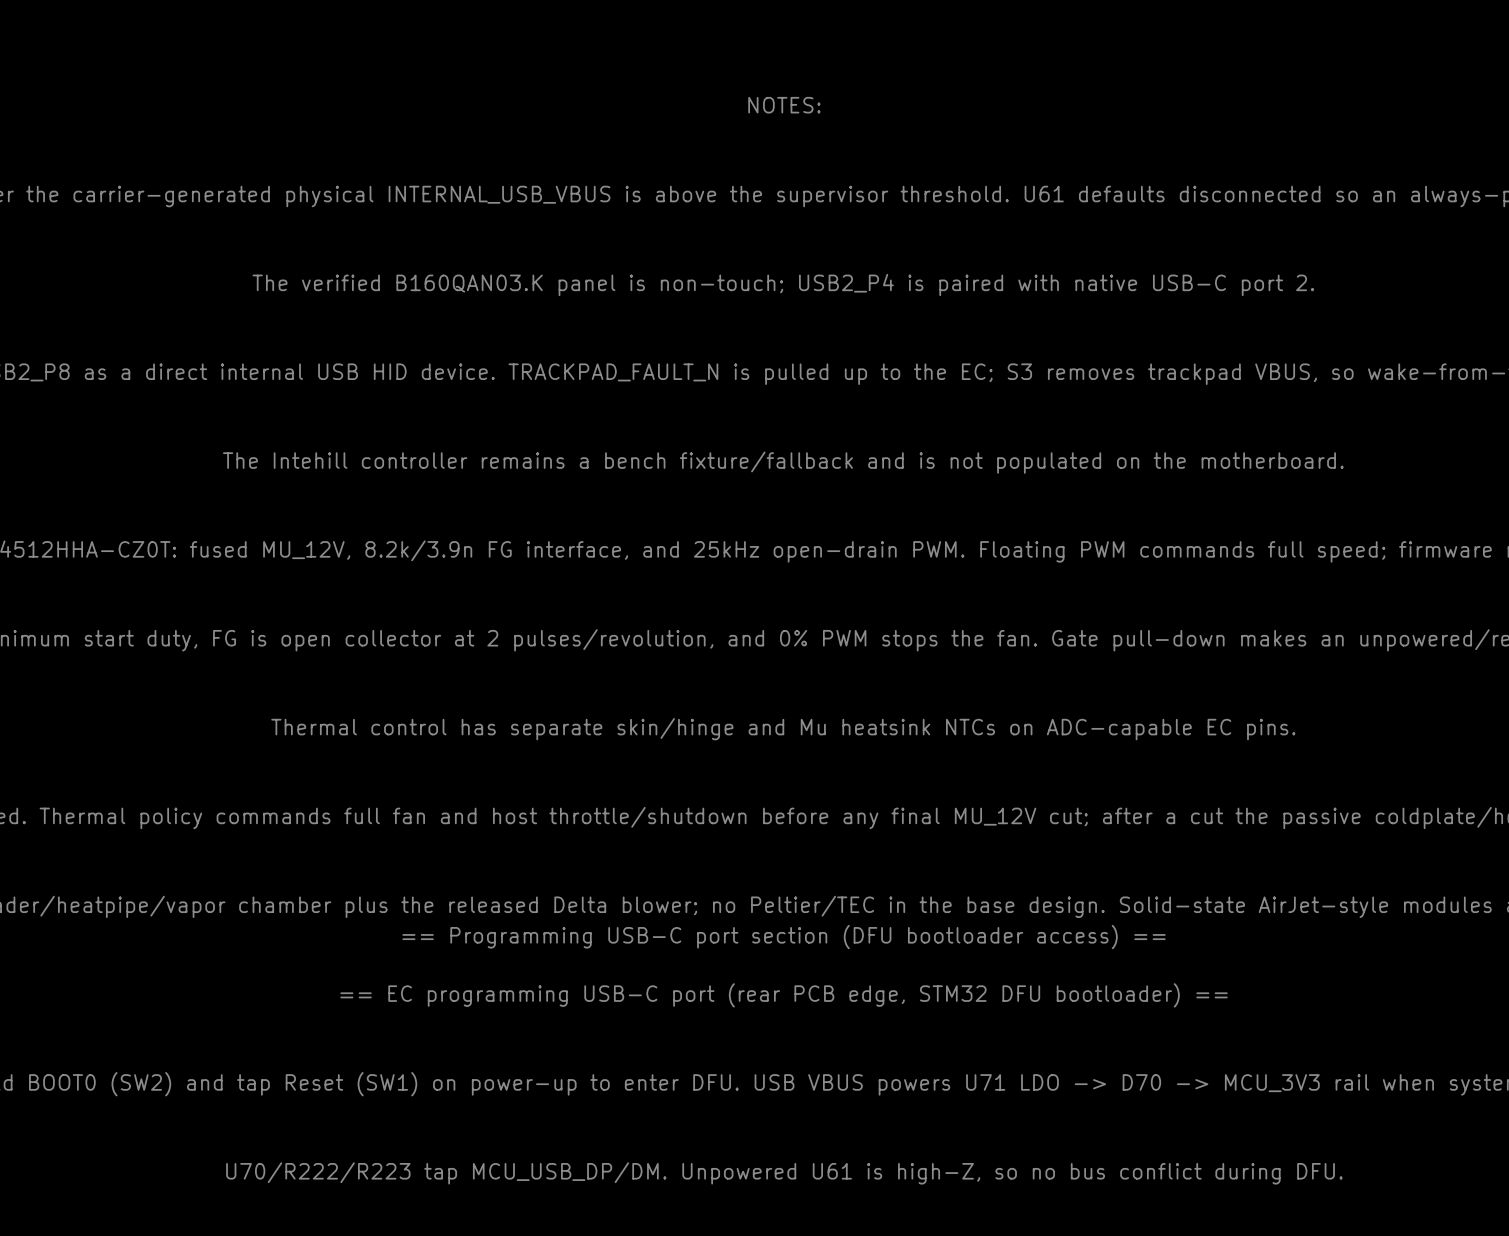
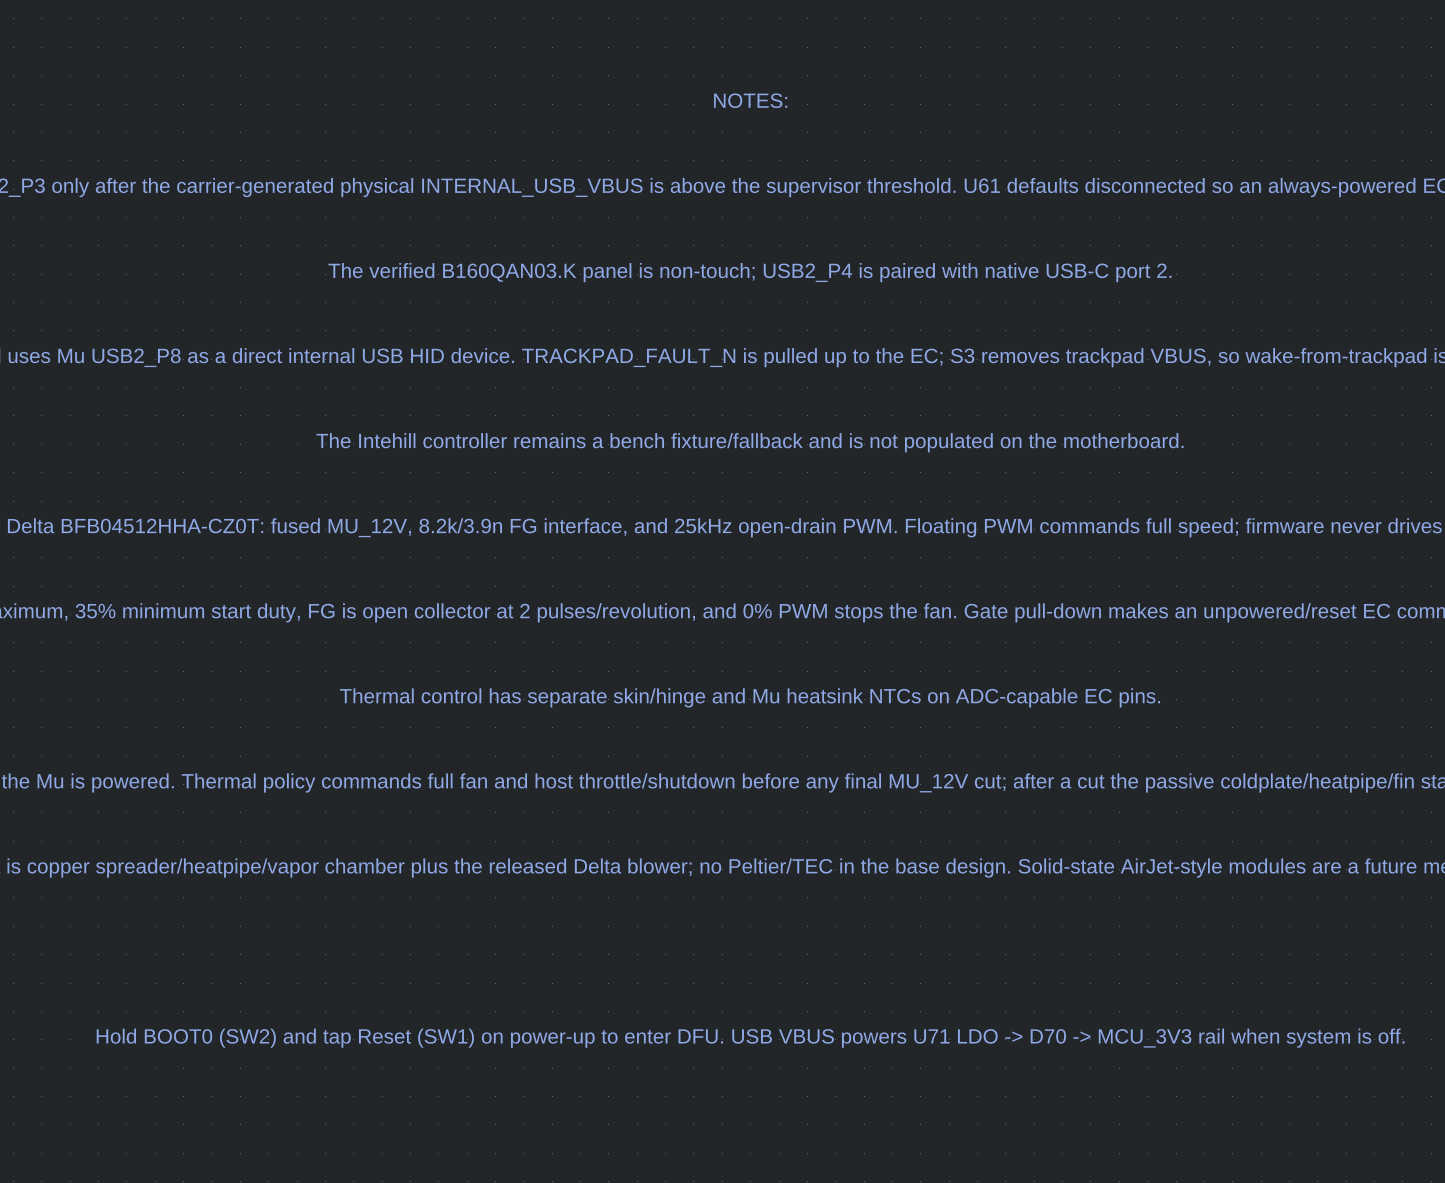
text: == Programming USB-C port section (DFU bootloader access) == (784, 937) -> none
text: == EC programming USB-C port (rear PCB edge, STM32 DFU bootloader) == (784, 995) -> none
text: U70/R222/R223 tap MCU_USB_DP/DM. Unpowered U61 is high-Z, so no bus conflict during DFU. (784, 1173) -> none

